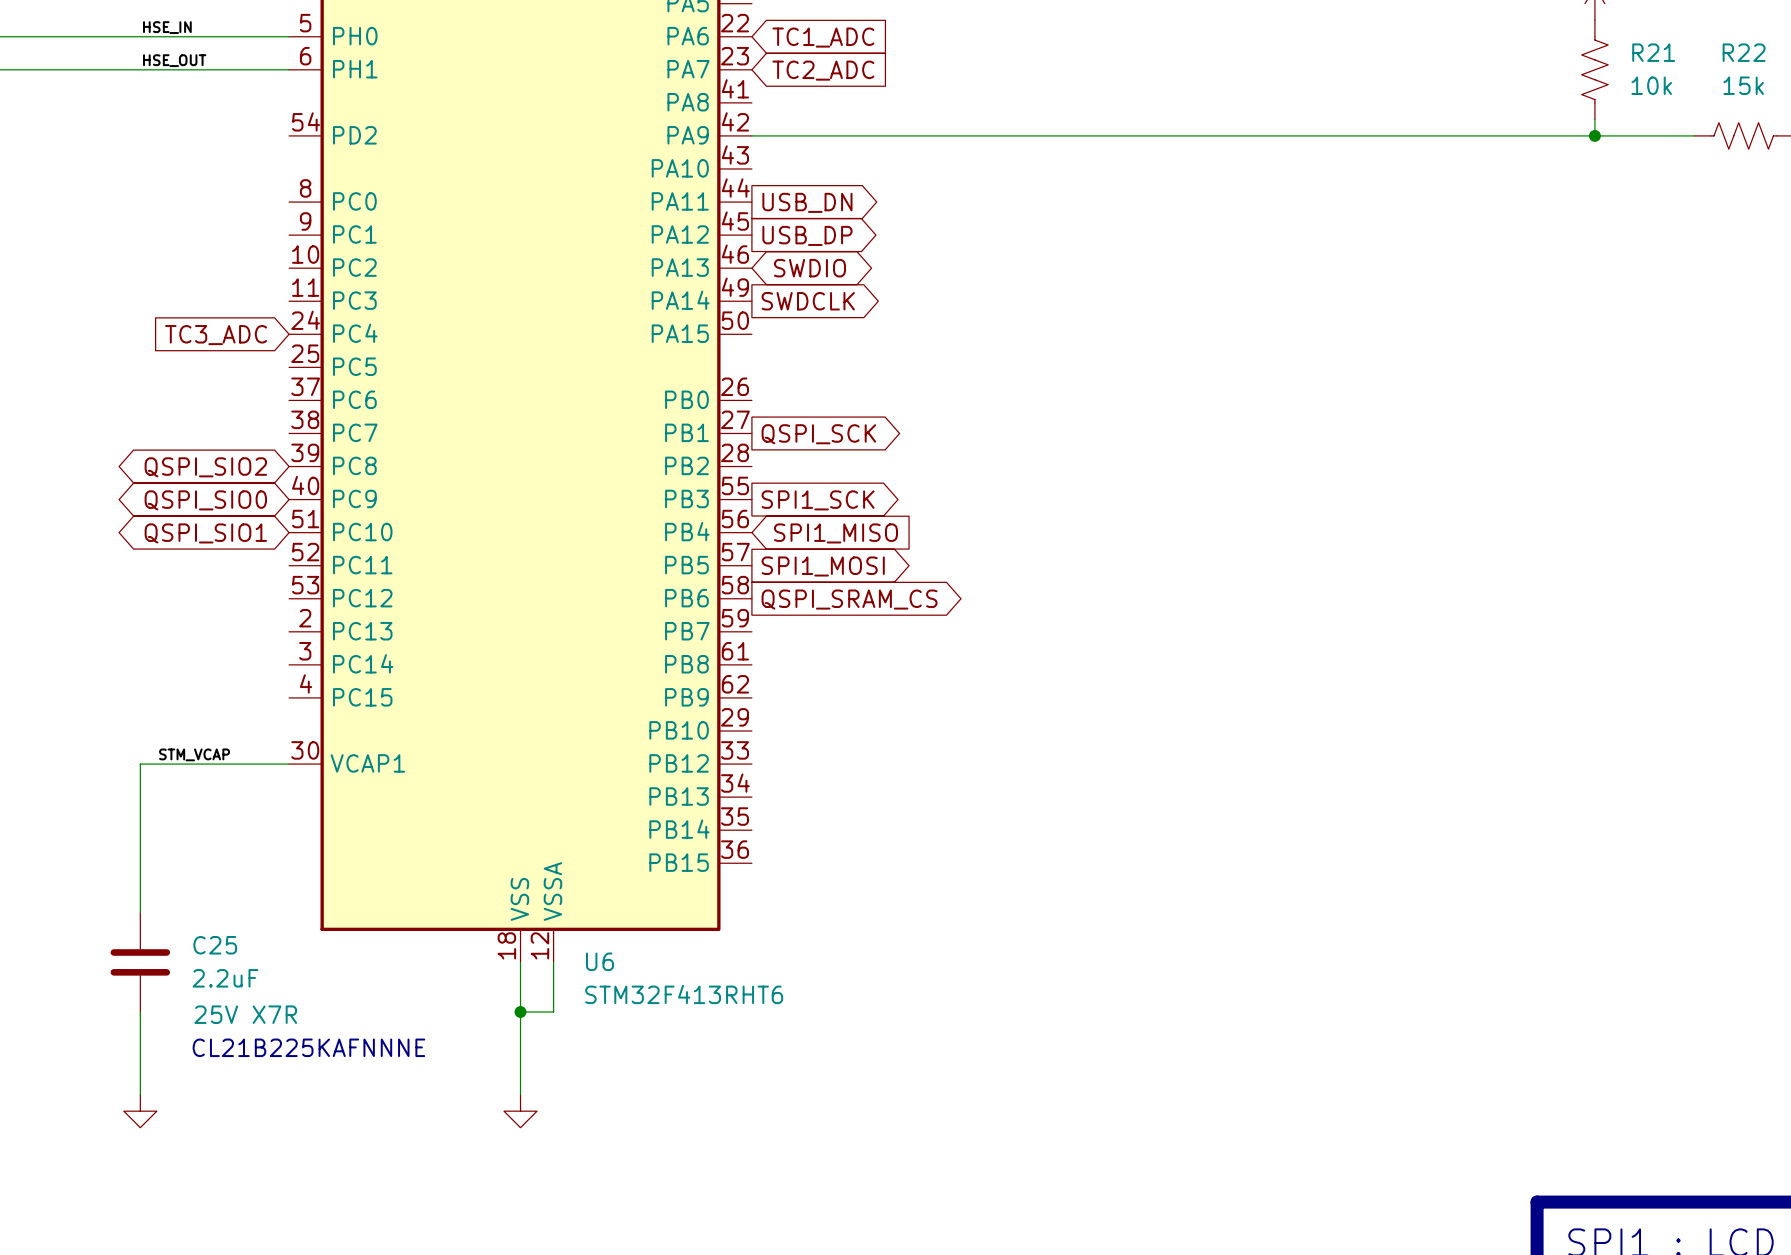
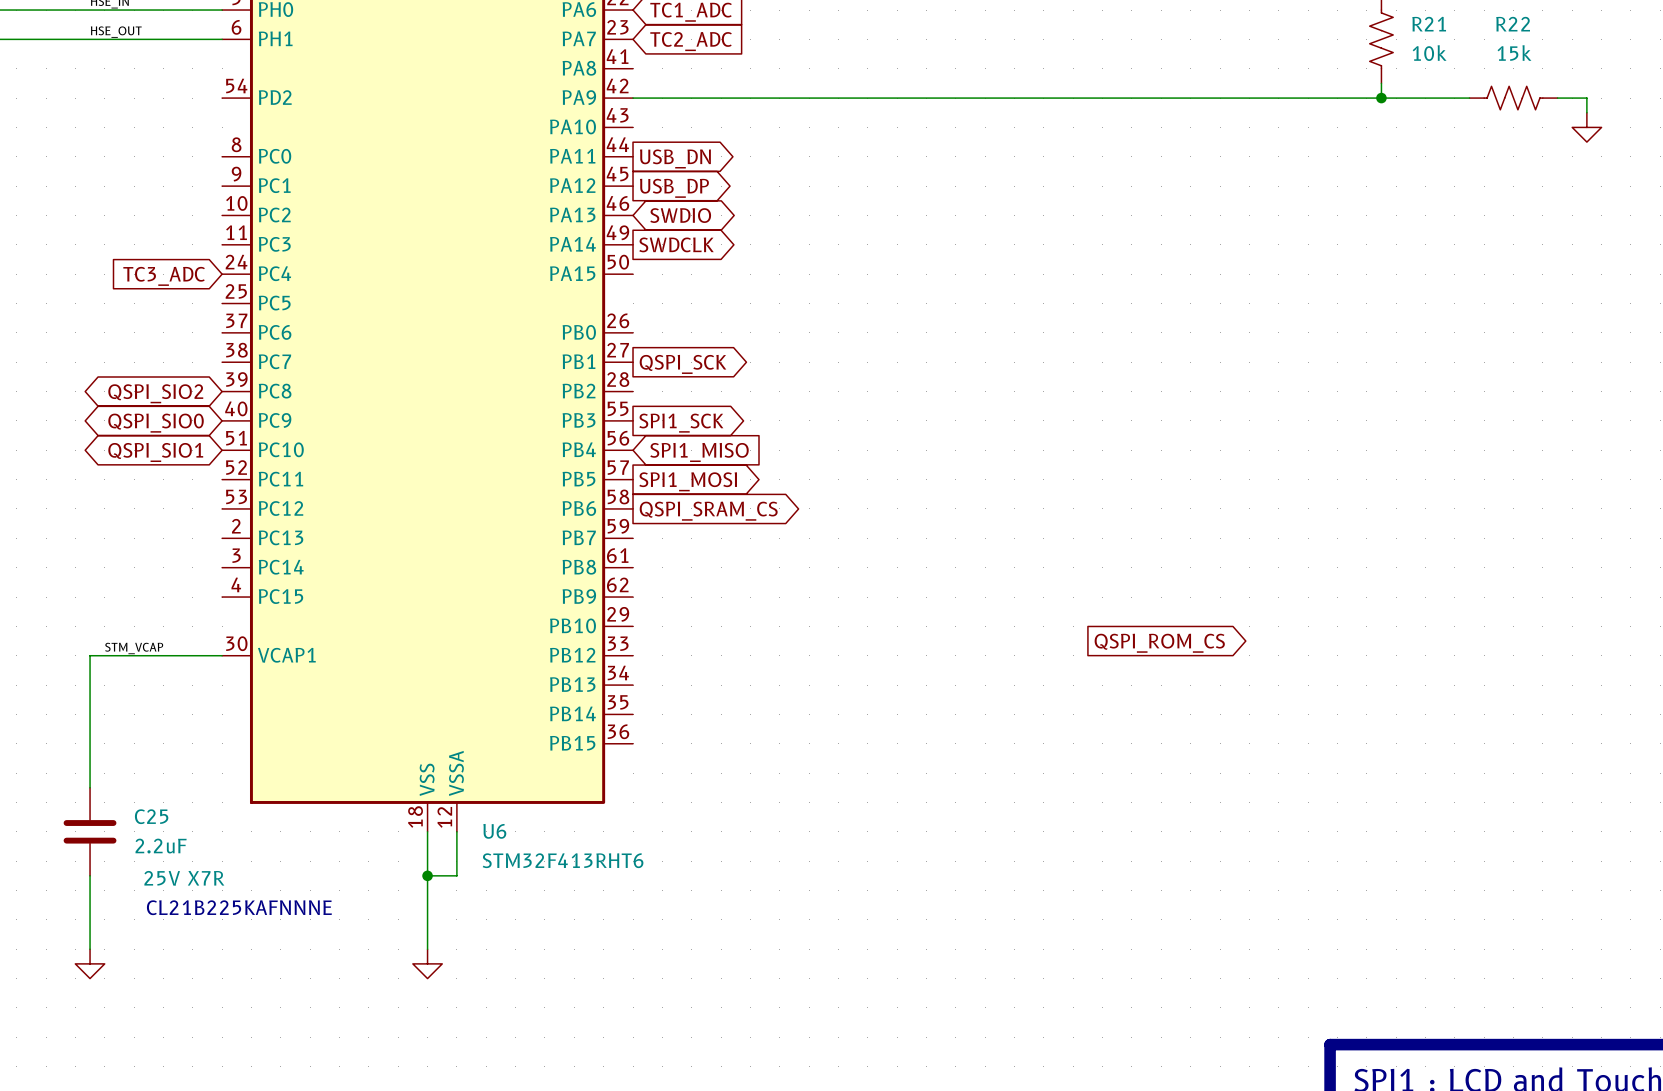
global label: none -> QSPI_ROM_CS (1159, 643)

